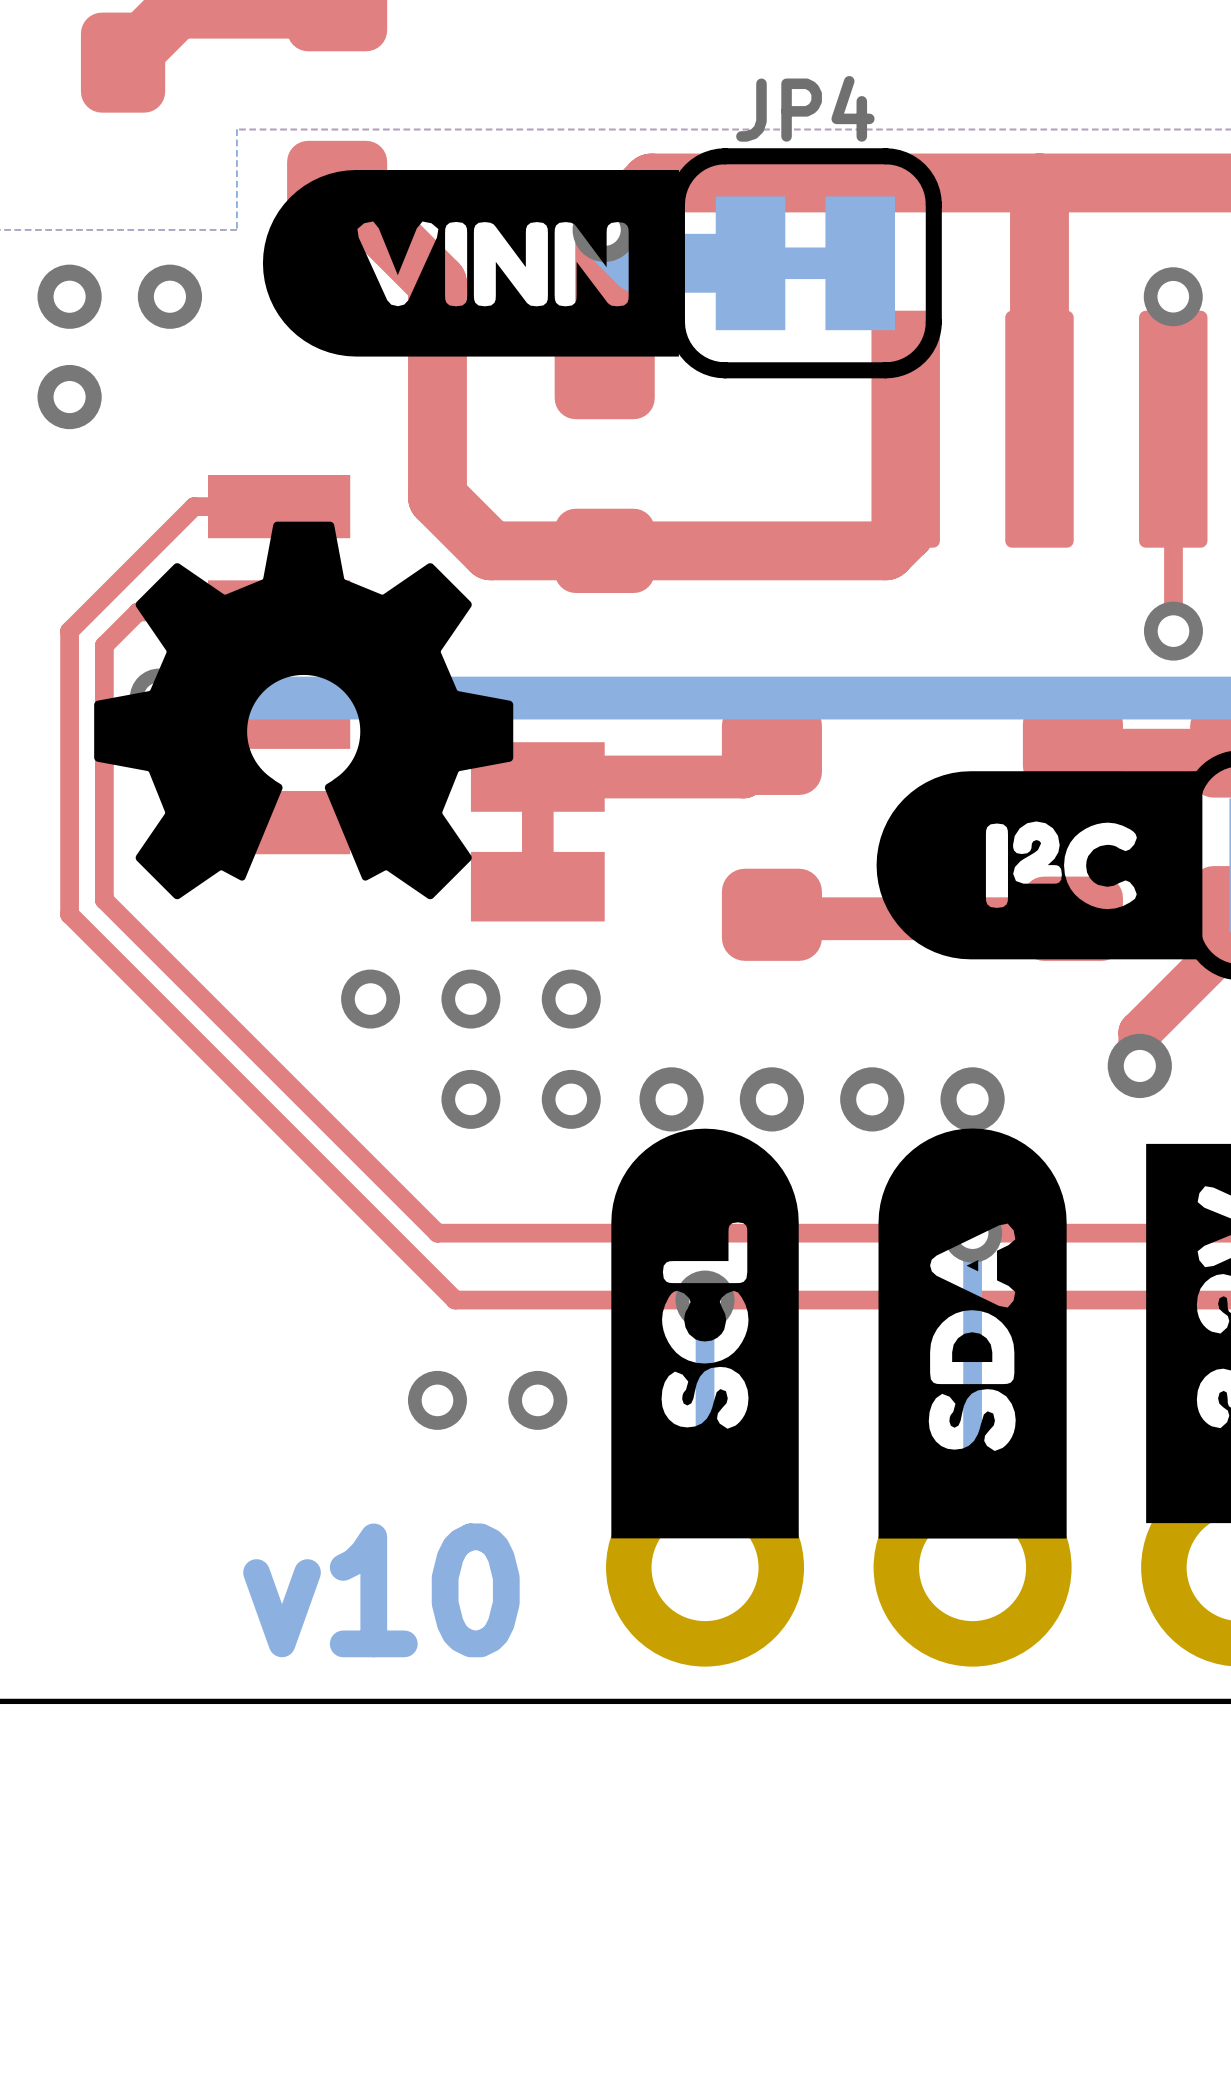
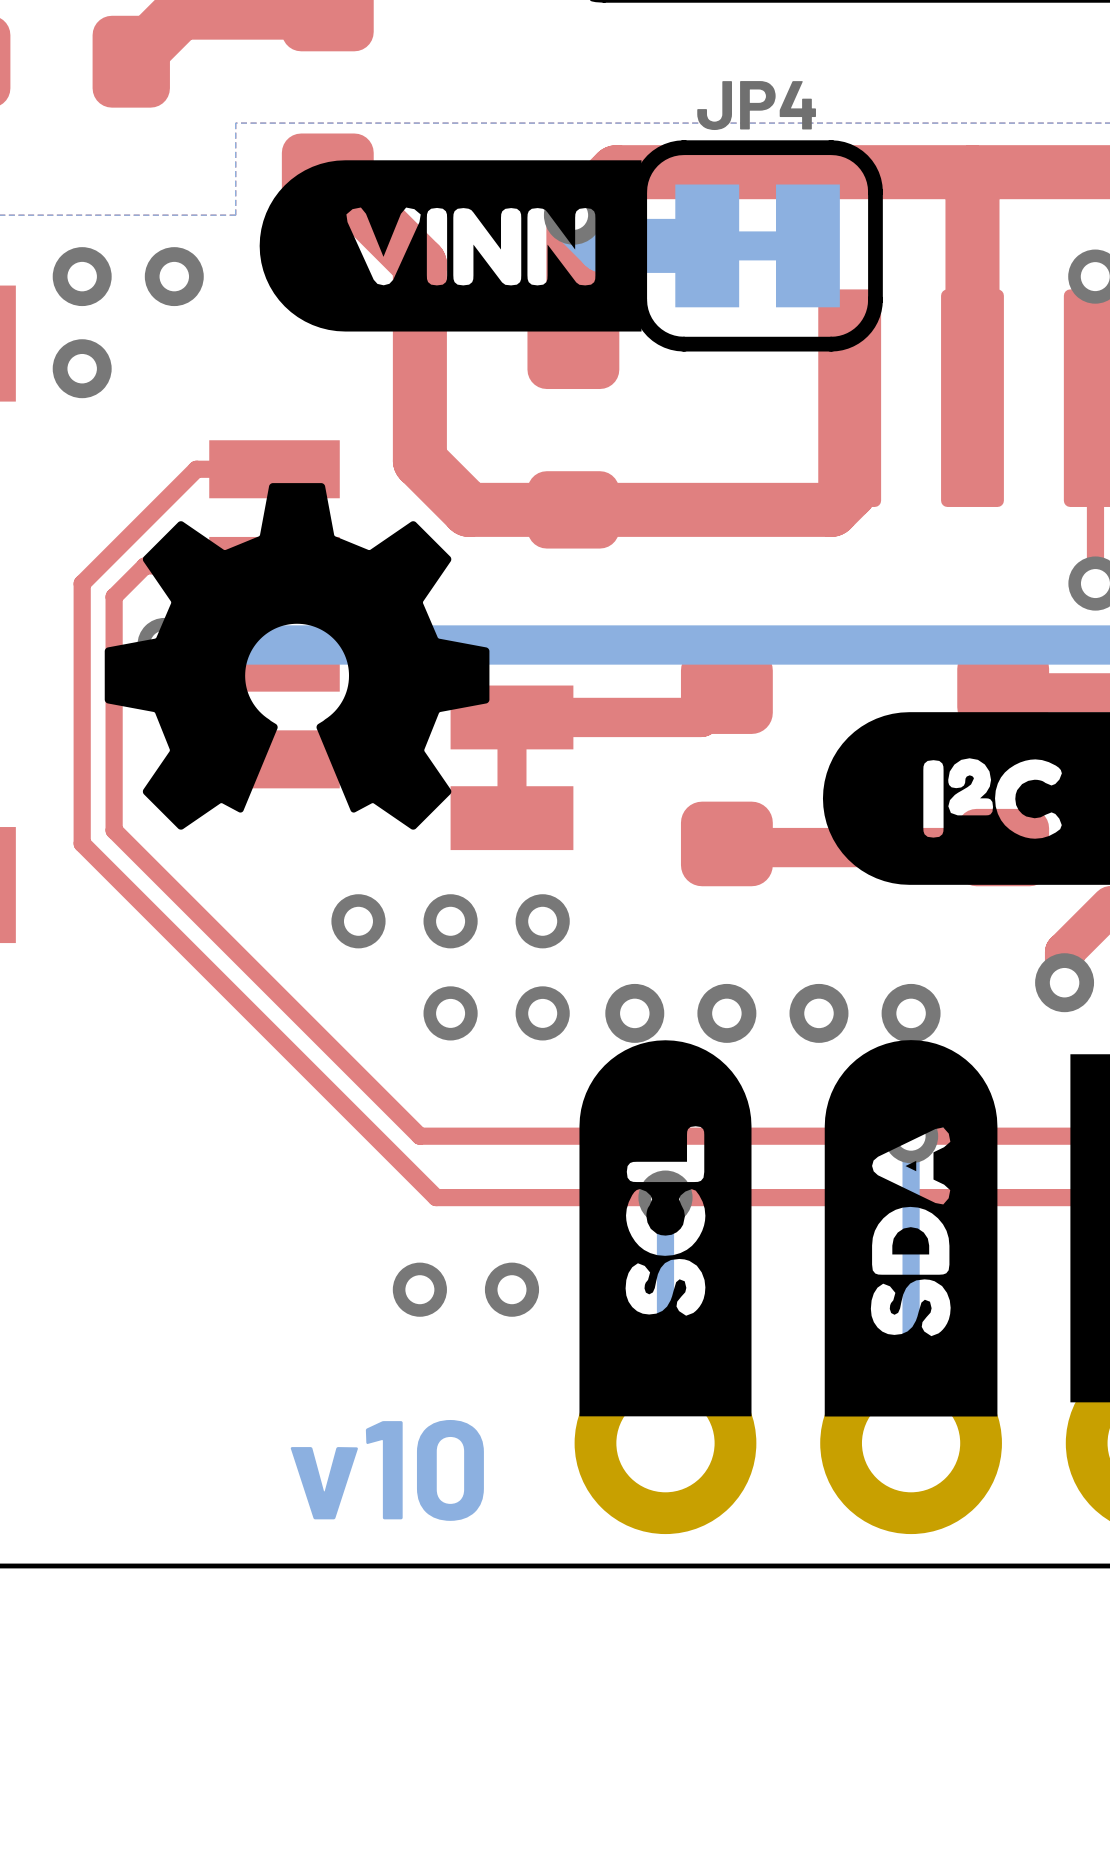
text position: v10 (381, 1590) -> v10 (387, 1470)

